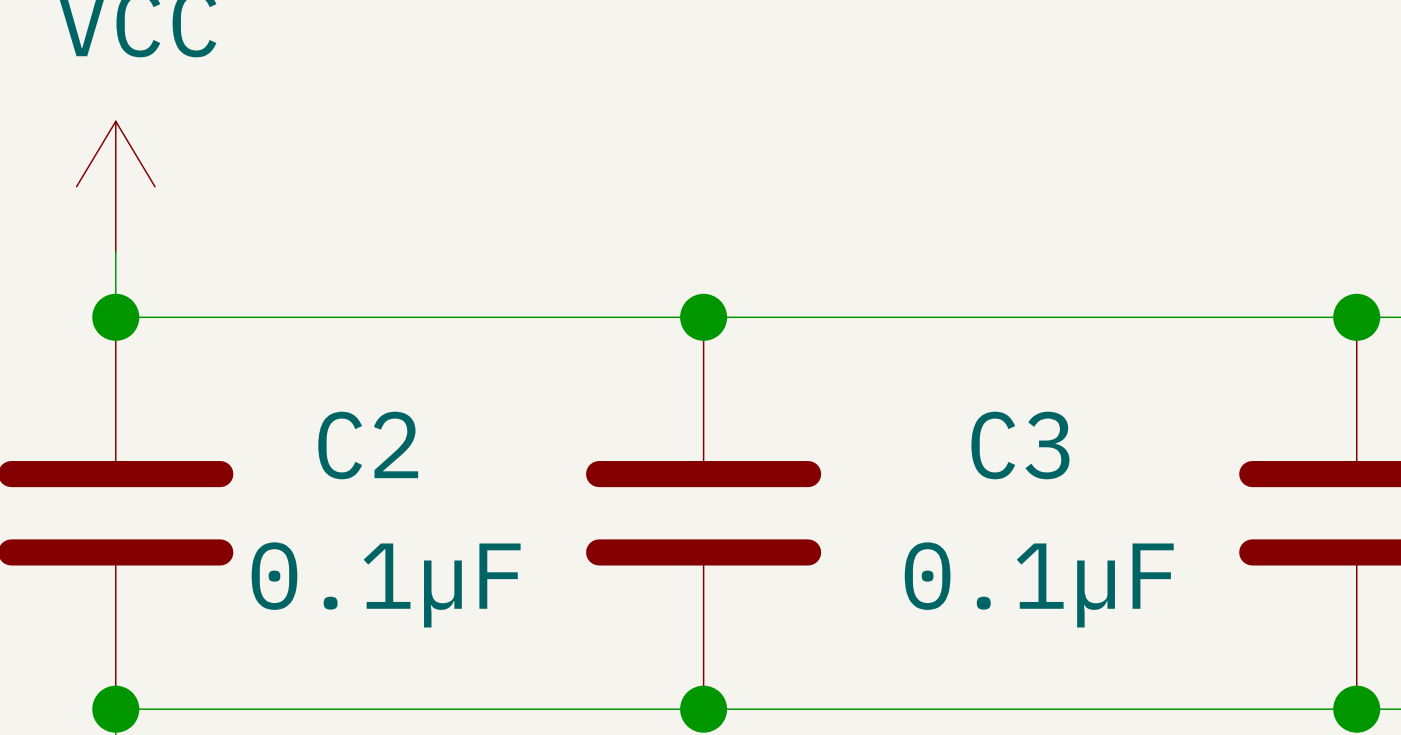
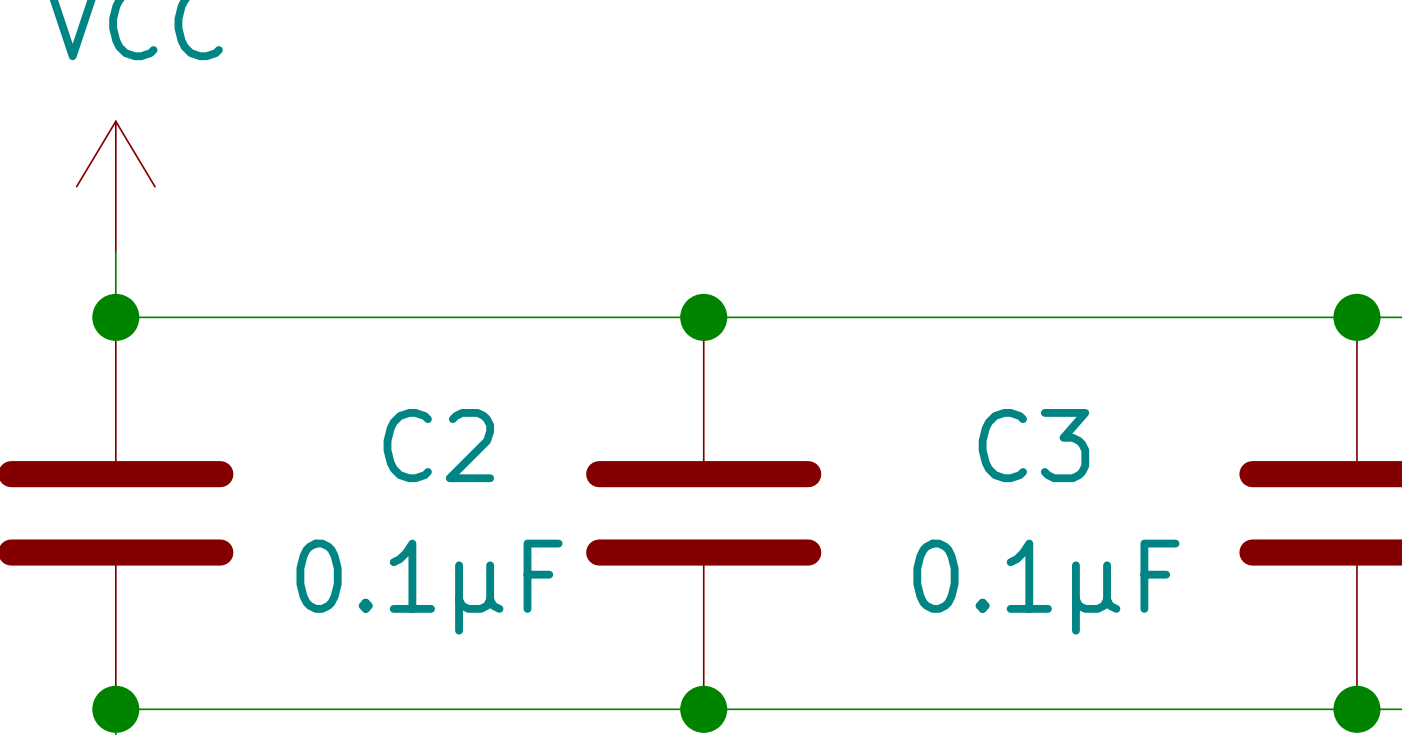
C2 name position: C2 (368, 445) -> C2 (438, 445)
C2 value position: 0.1µF (386, 584) -> 0.1µF (429, 587)

